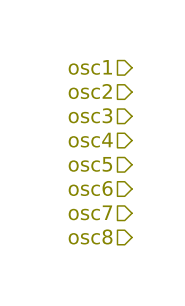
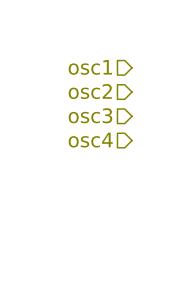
hierarchical label: osc5 (90, 164) -> none
hierarchical label: osc6 (90, 188) -> none
hierarchical label: osc7 (90, 212) -> none
hierarchical label: osc8 (90, 236) -> none

